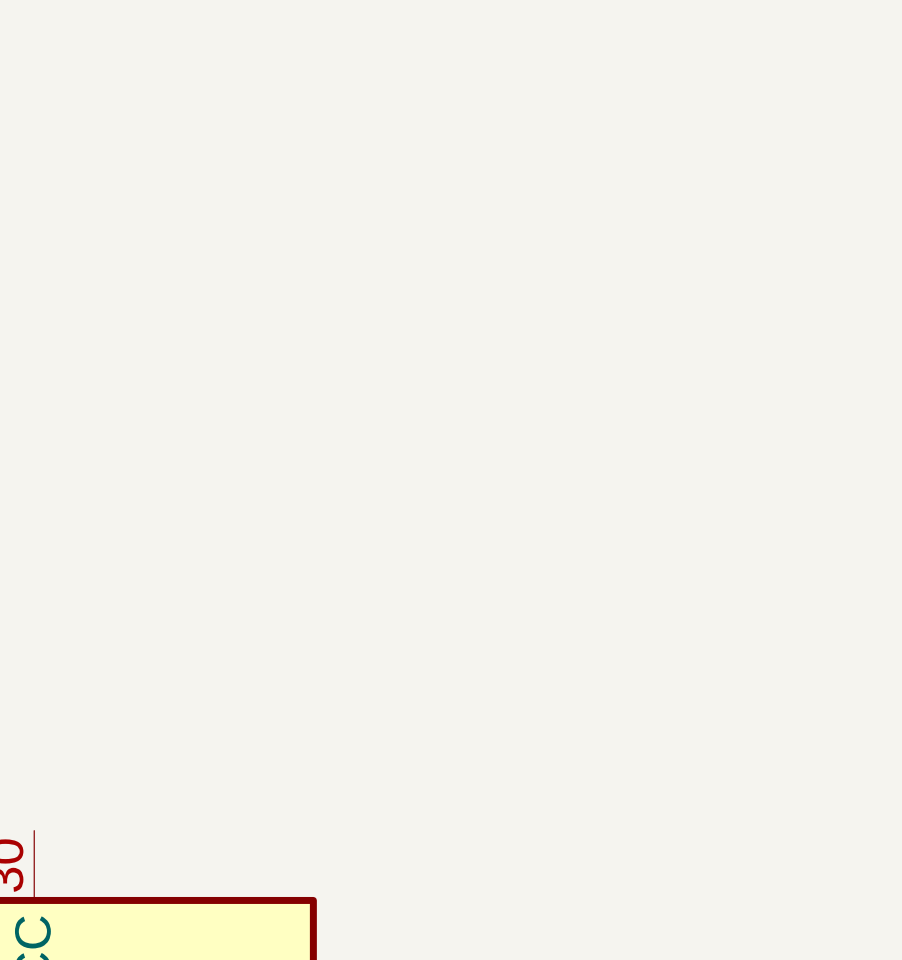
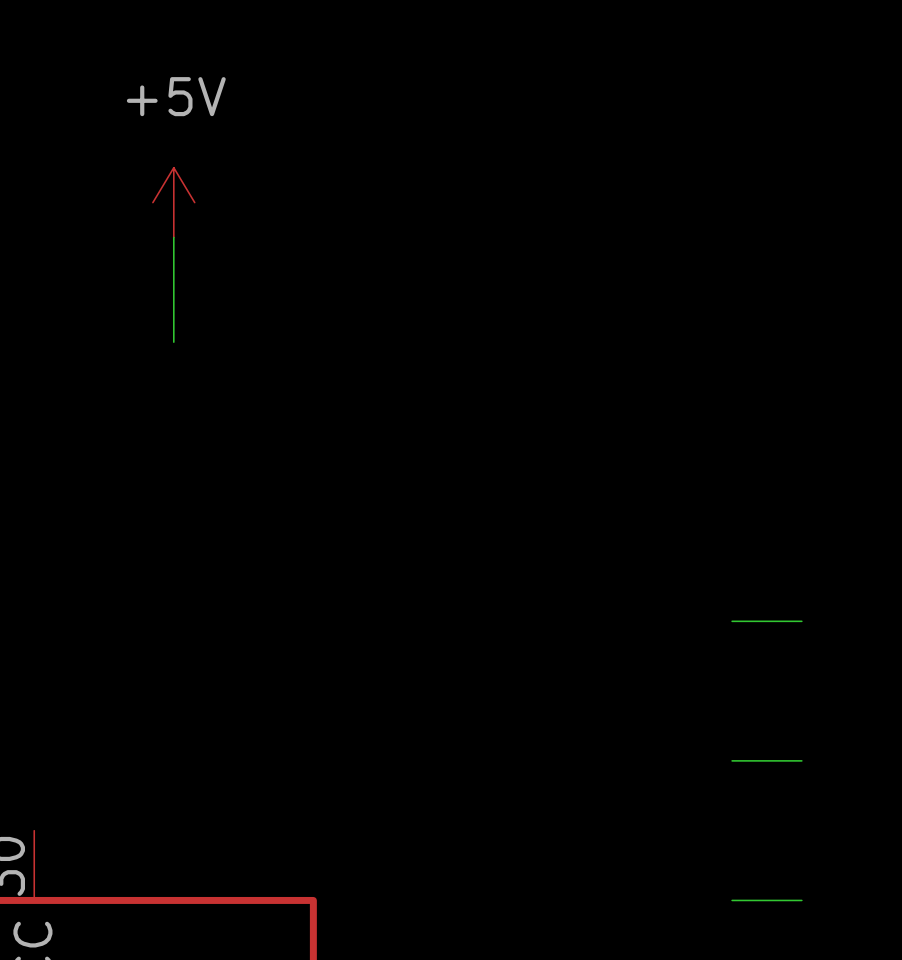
power symbol: none -> +5V (173, 202)
wire: none -> (173, 237) (173, 342)
wire: none -> (732, 621) (801, 621)
wire: none -> (732, 760) (801, 760)
wire: none -> (732, 900) (801, 900)

